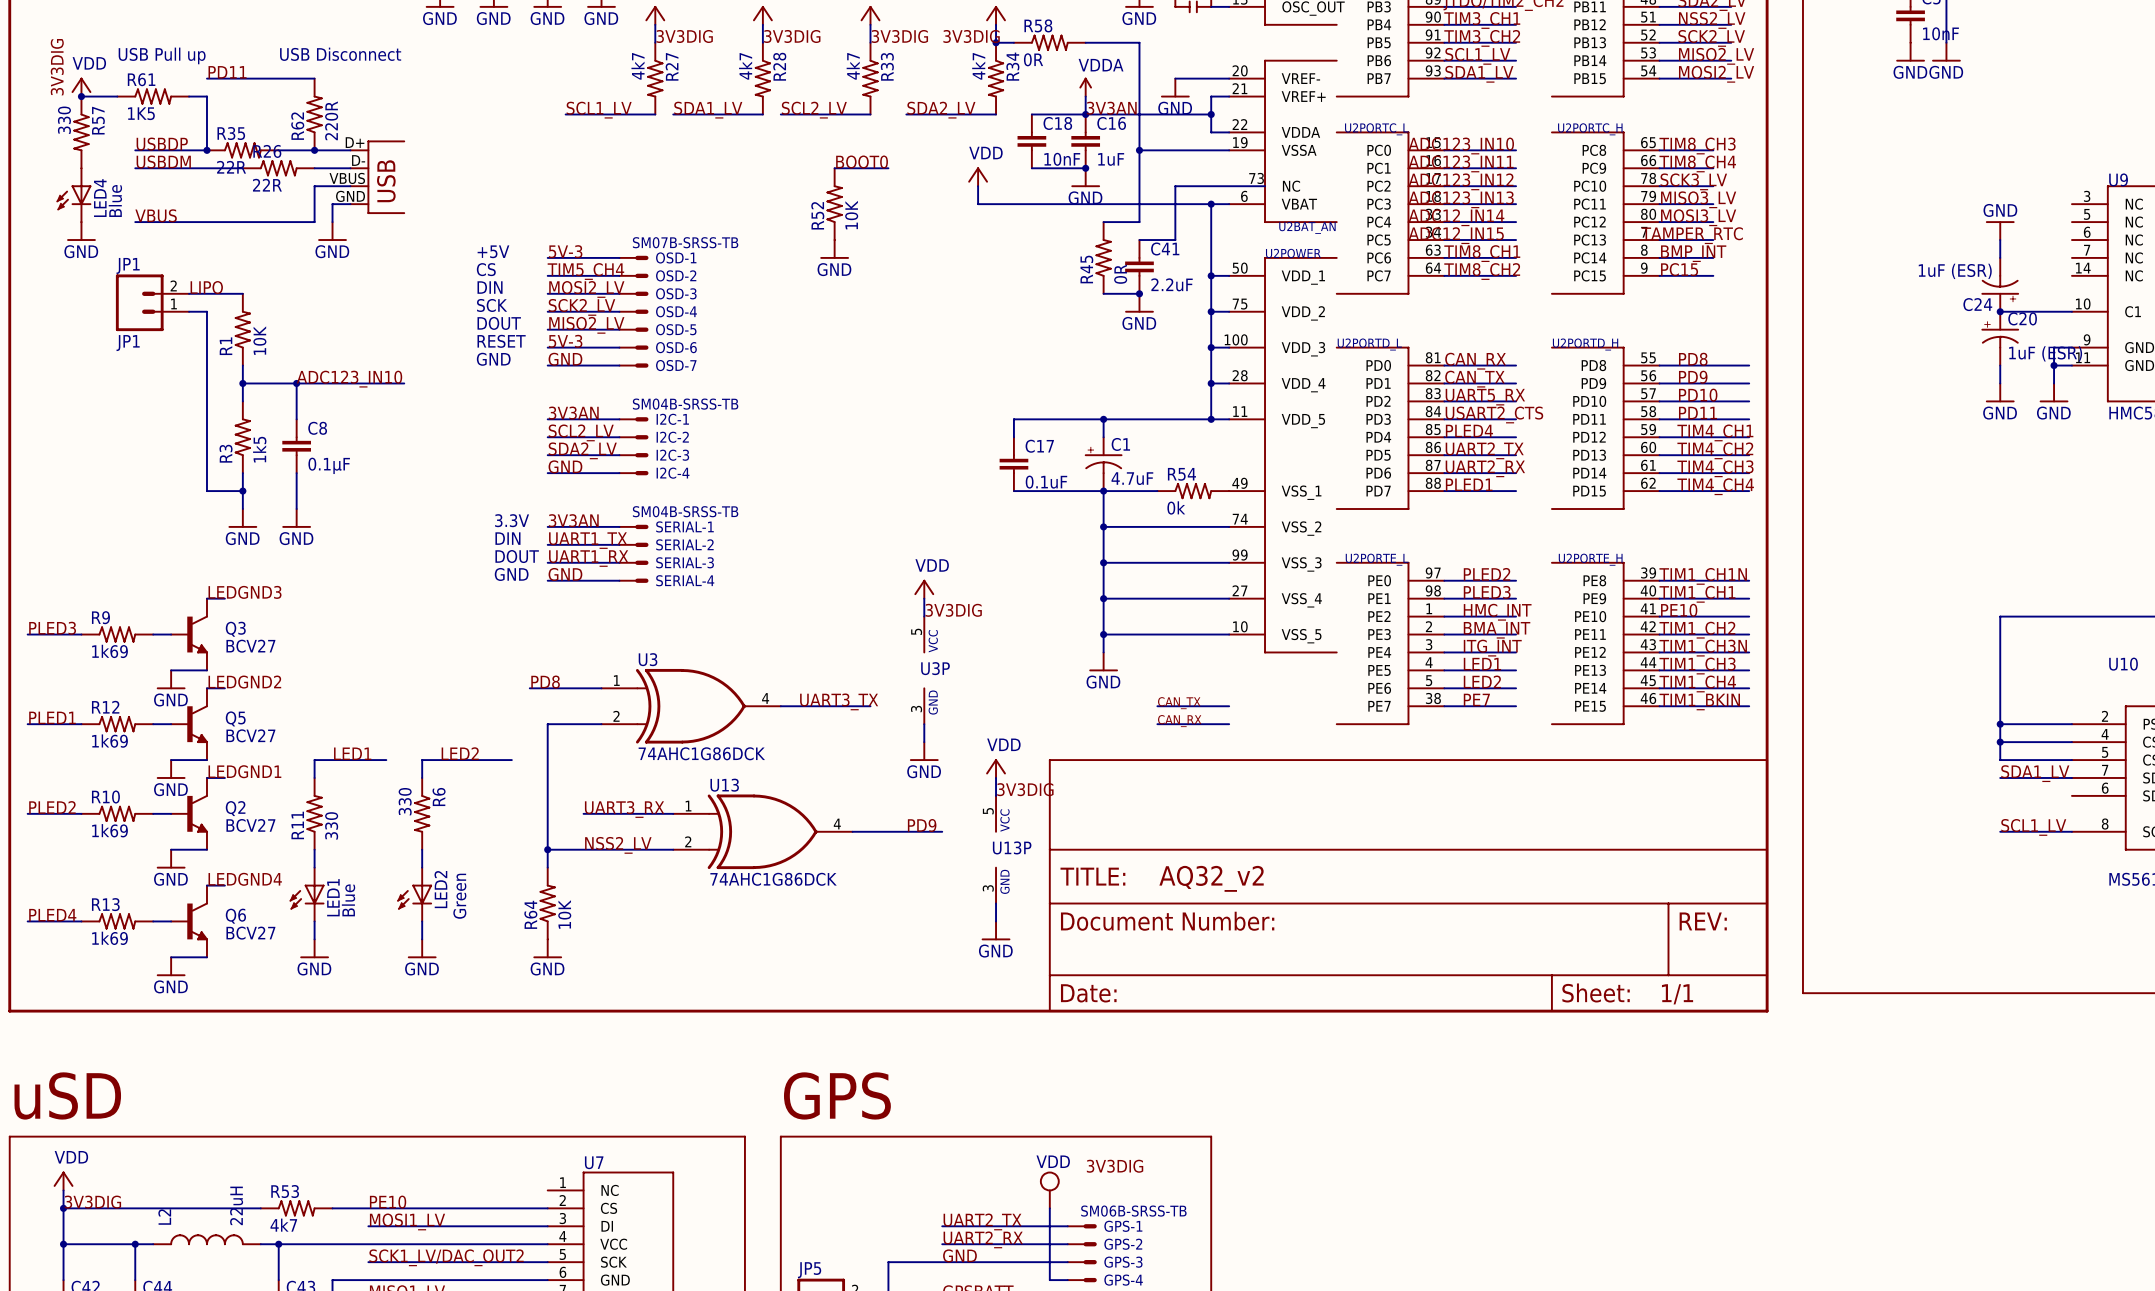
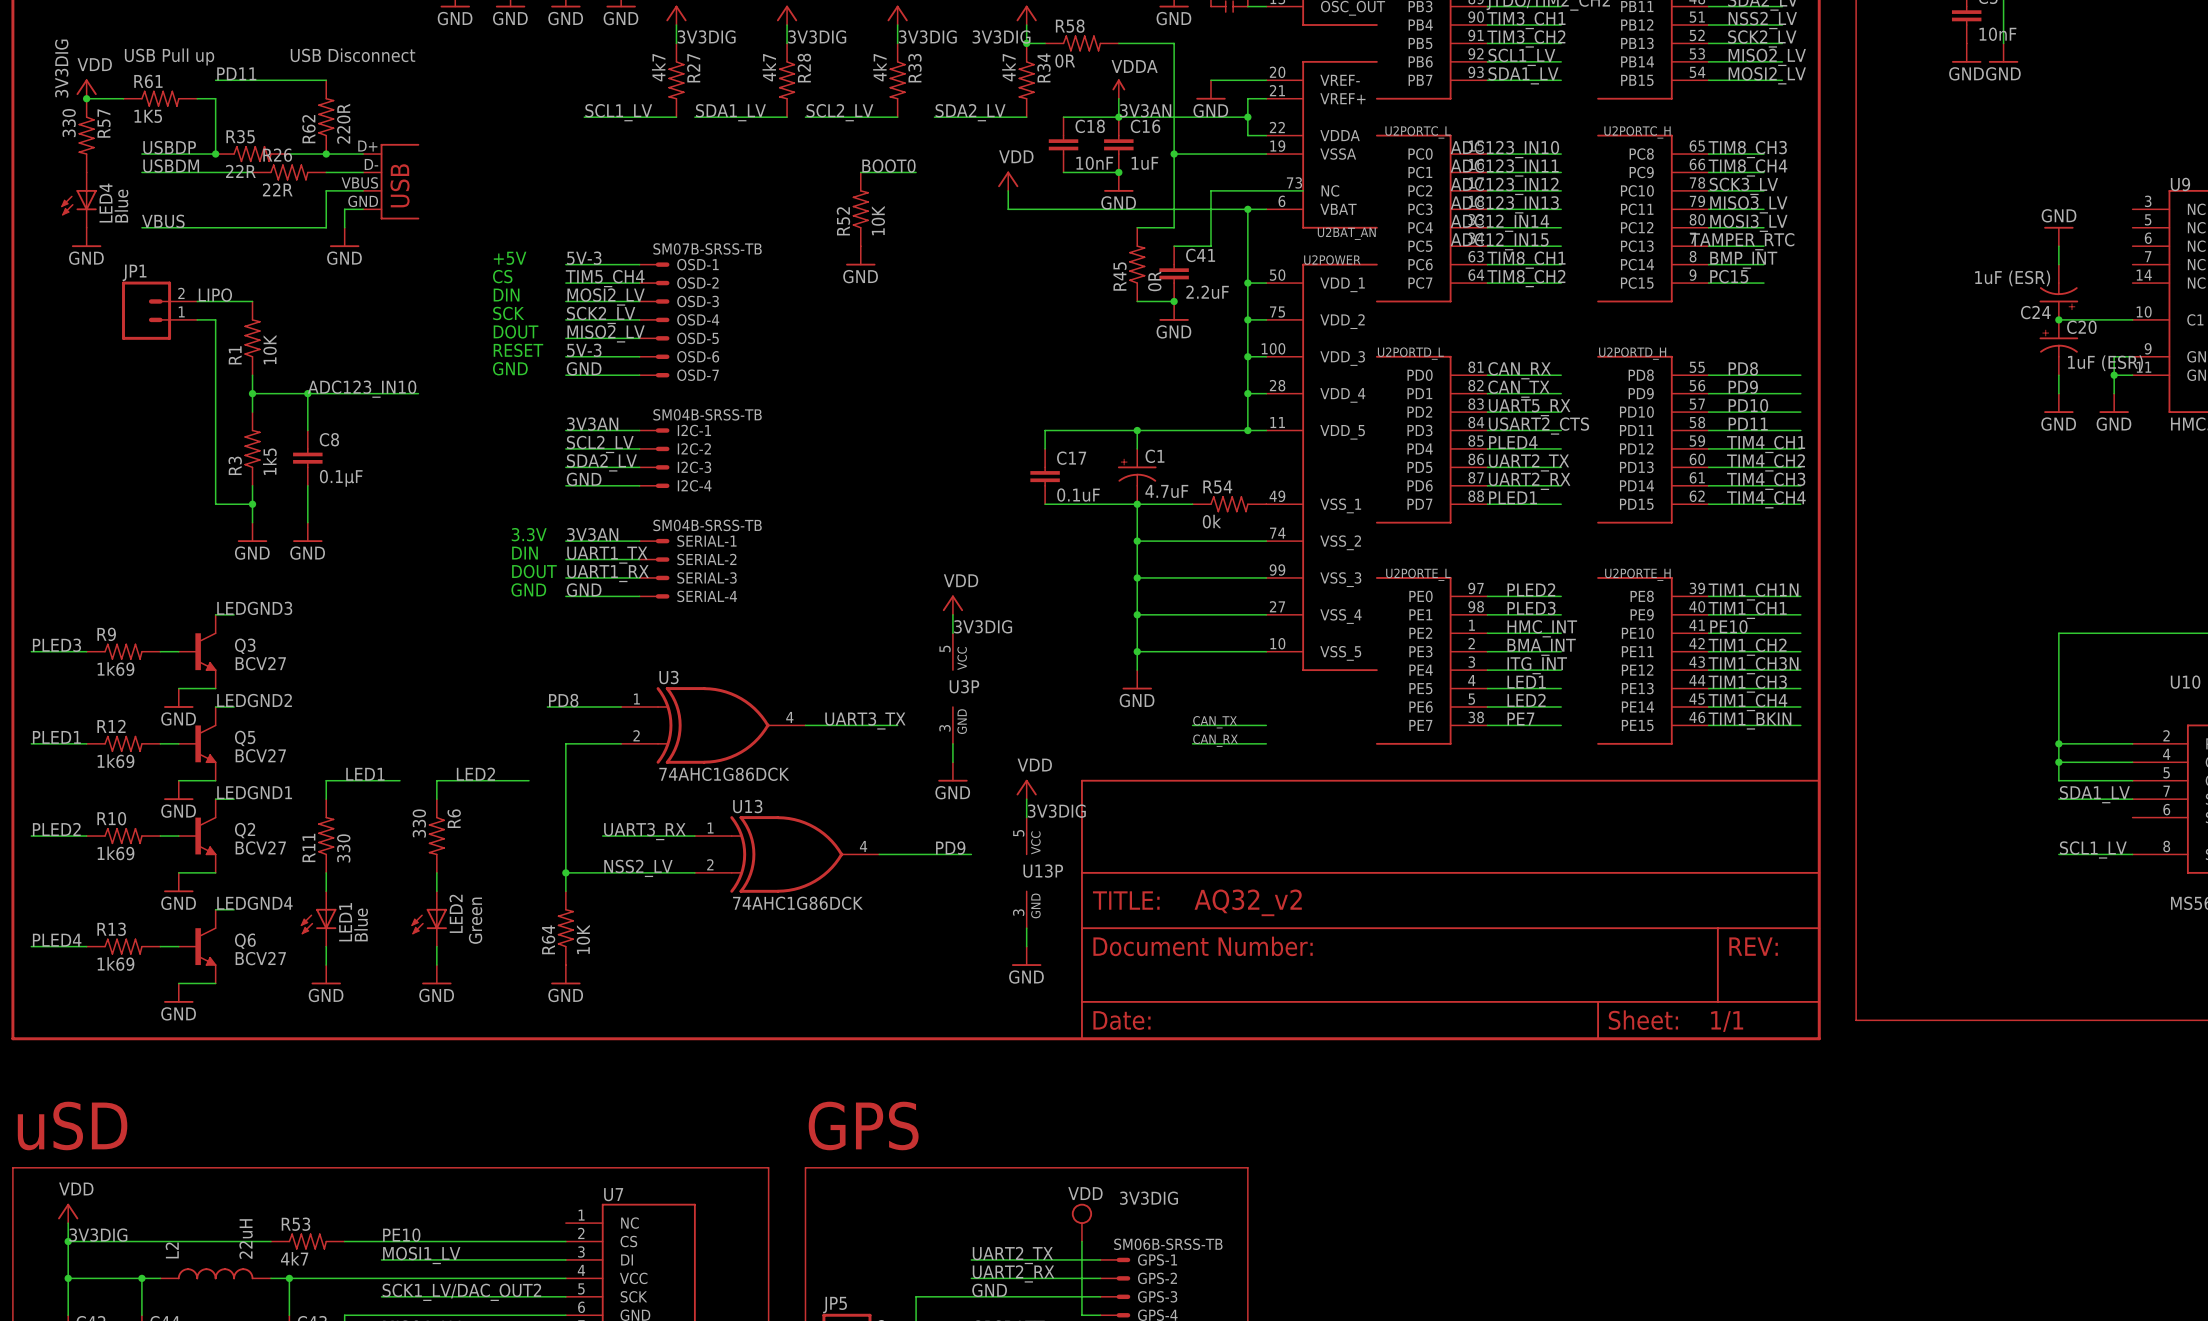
JP1 value: JP1 (128, 343) -> none

